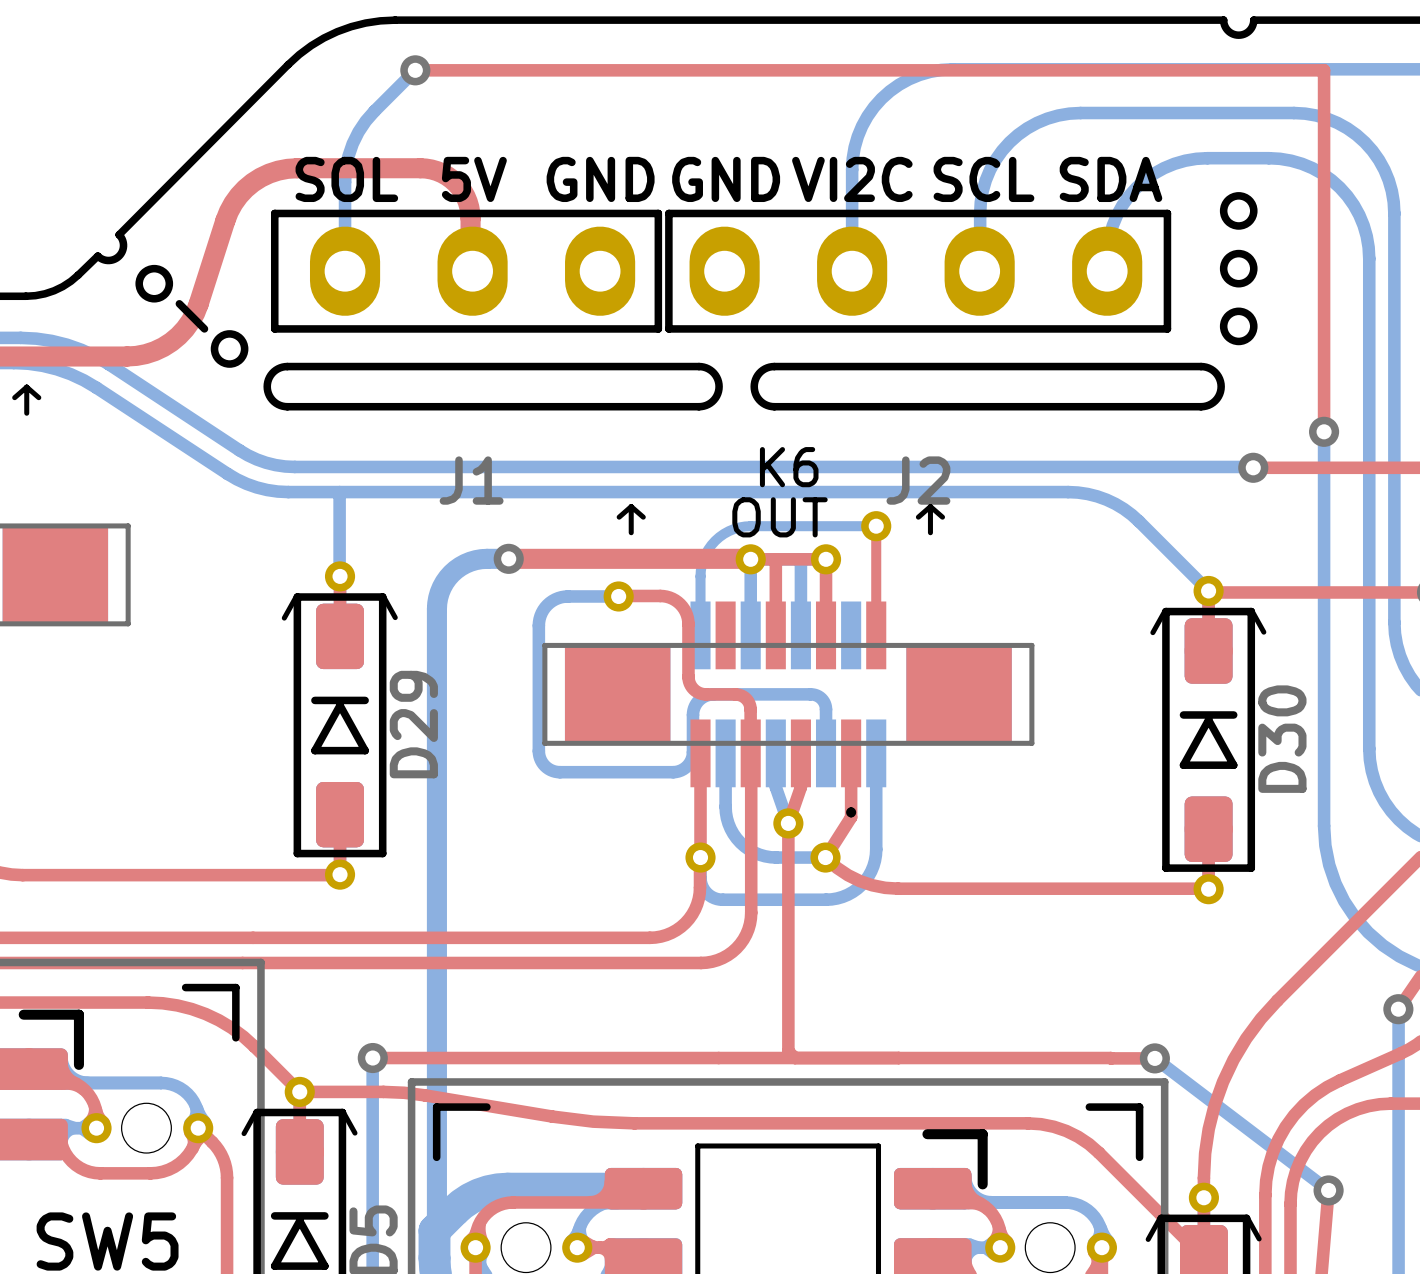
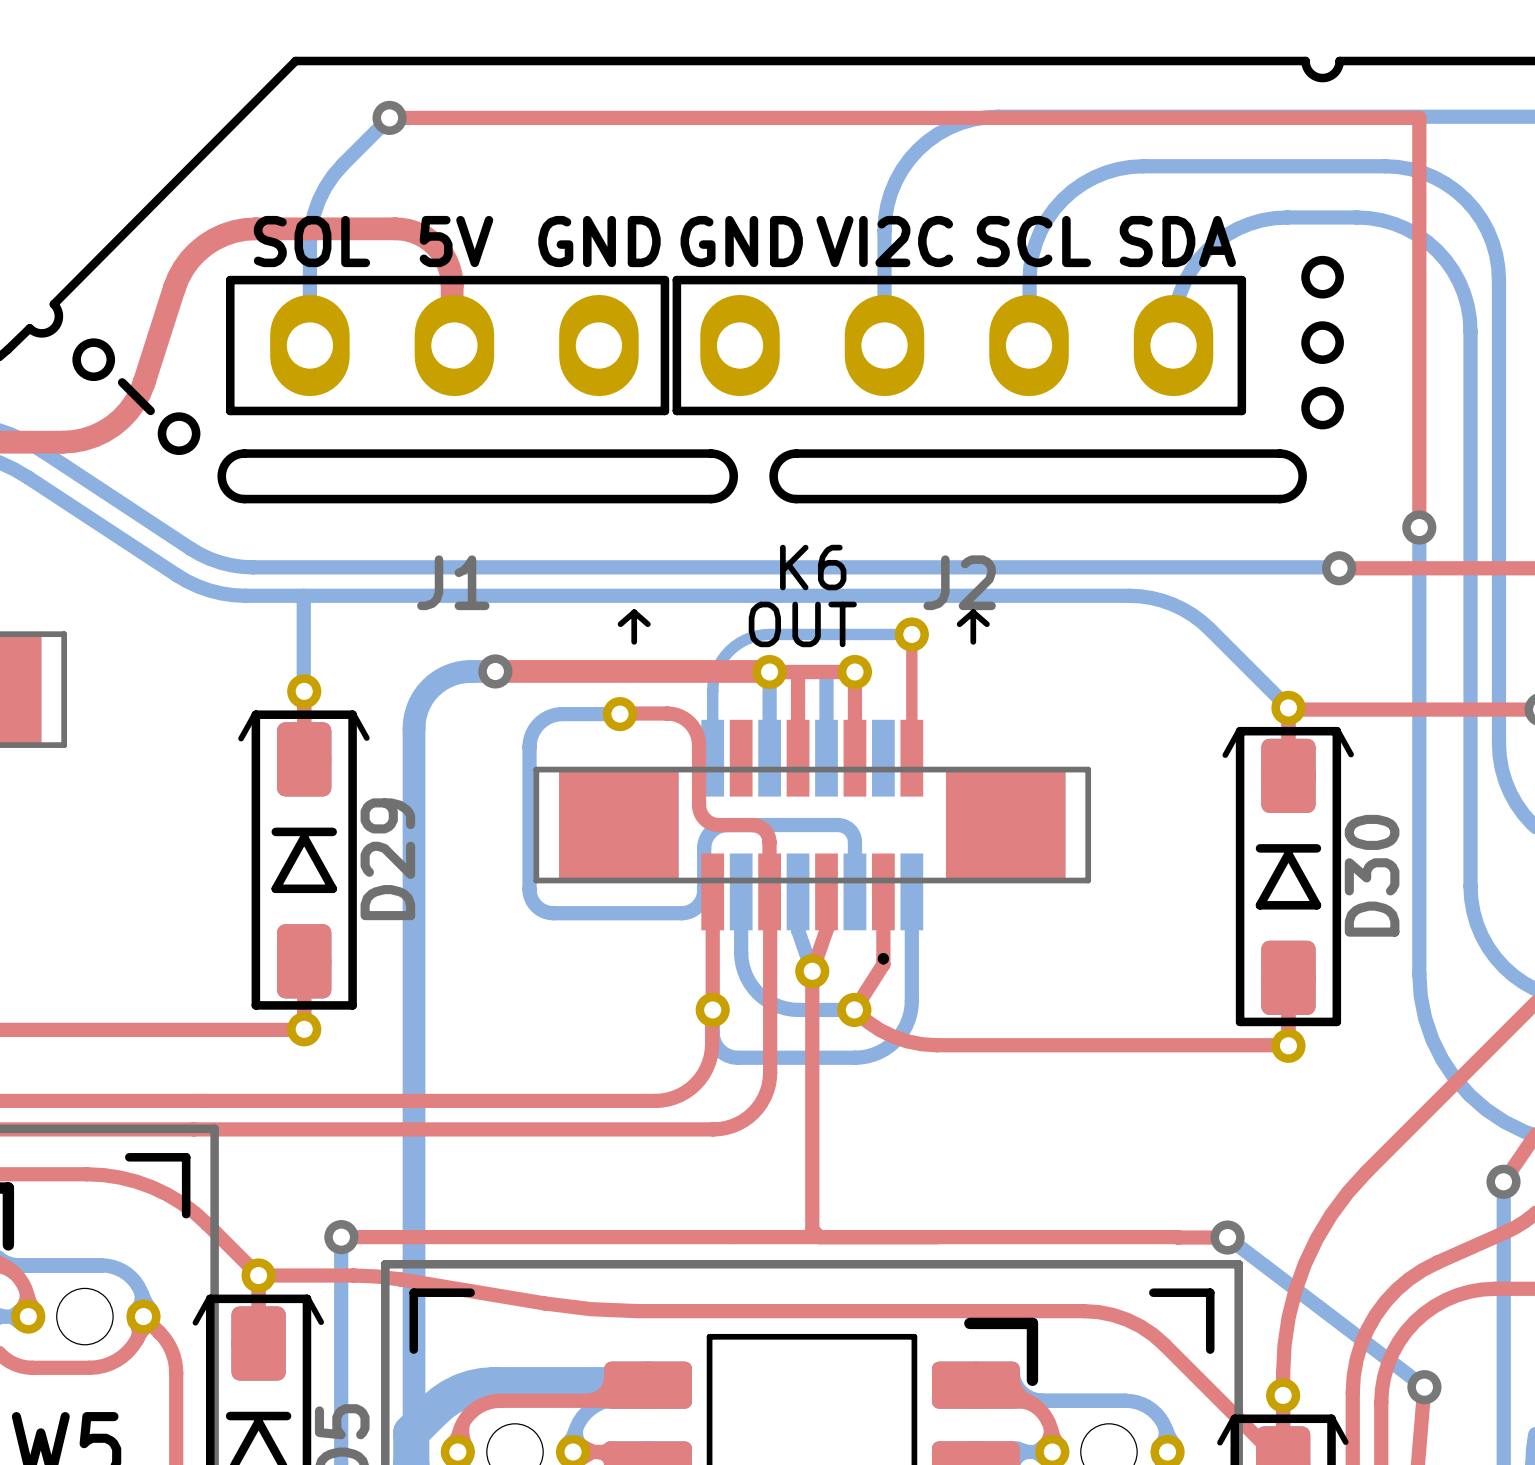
board edge: (395, 20) (365, 23) (337, 31) (311, 45) (288, 64) -> (366, 61) (295, 61) (245, 111)

